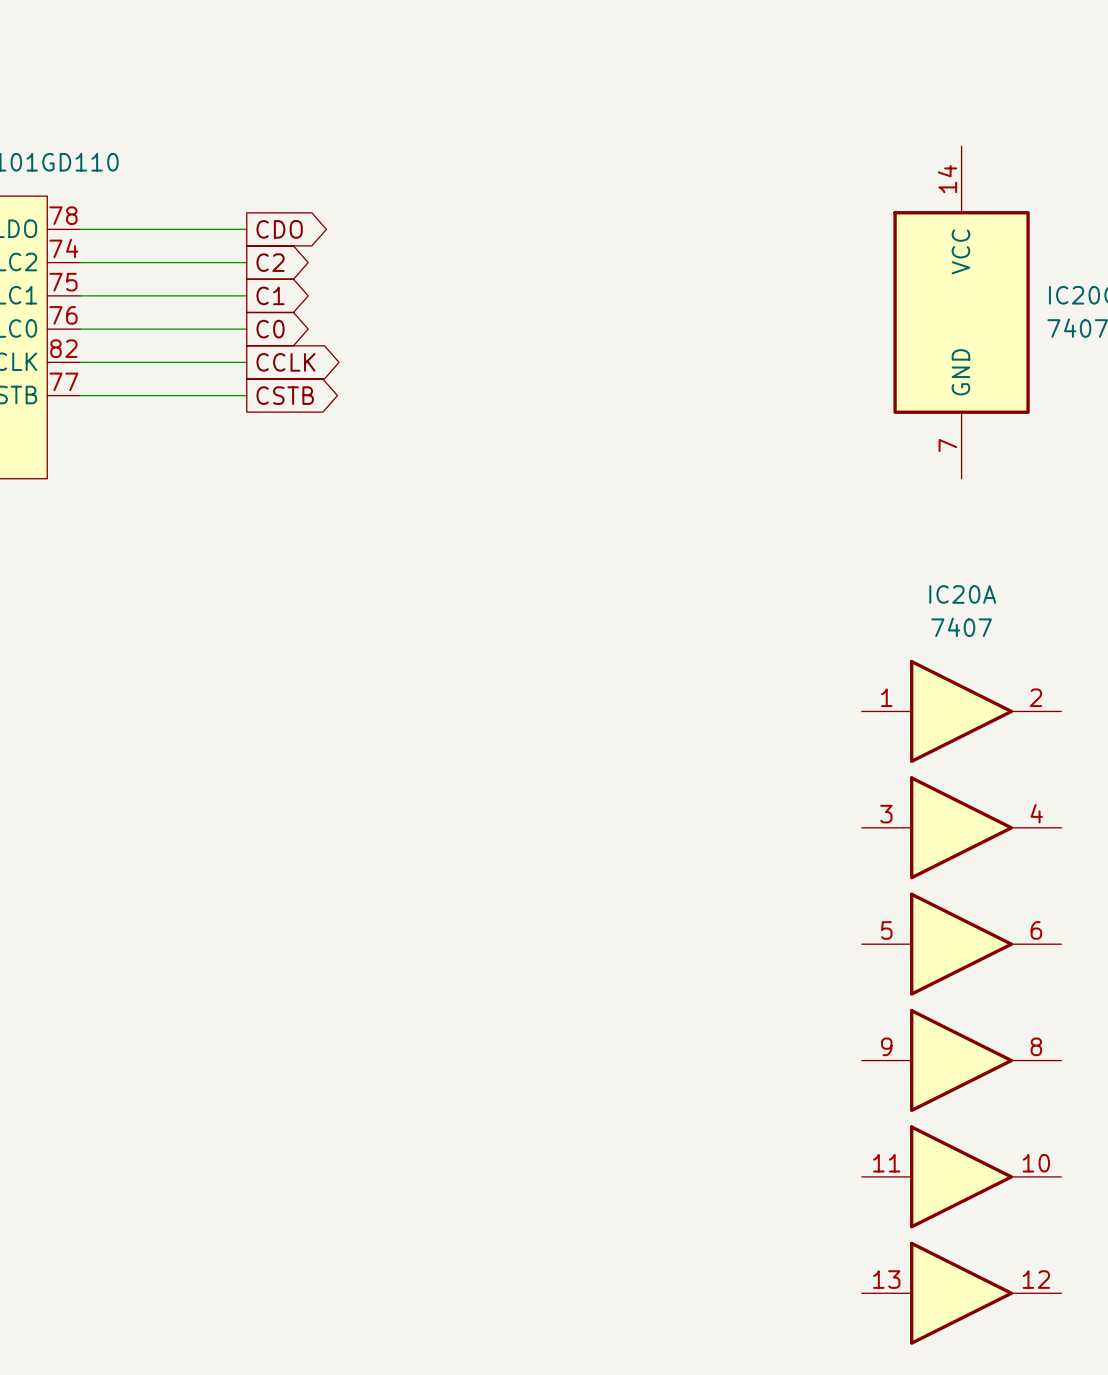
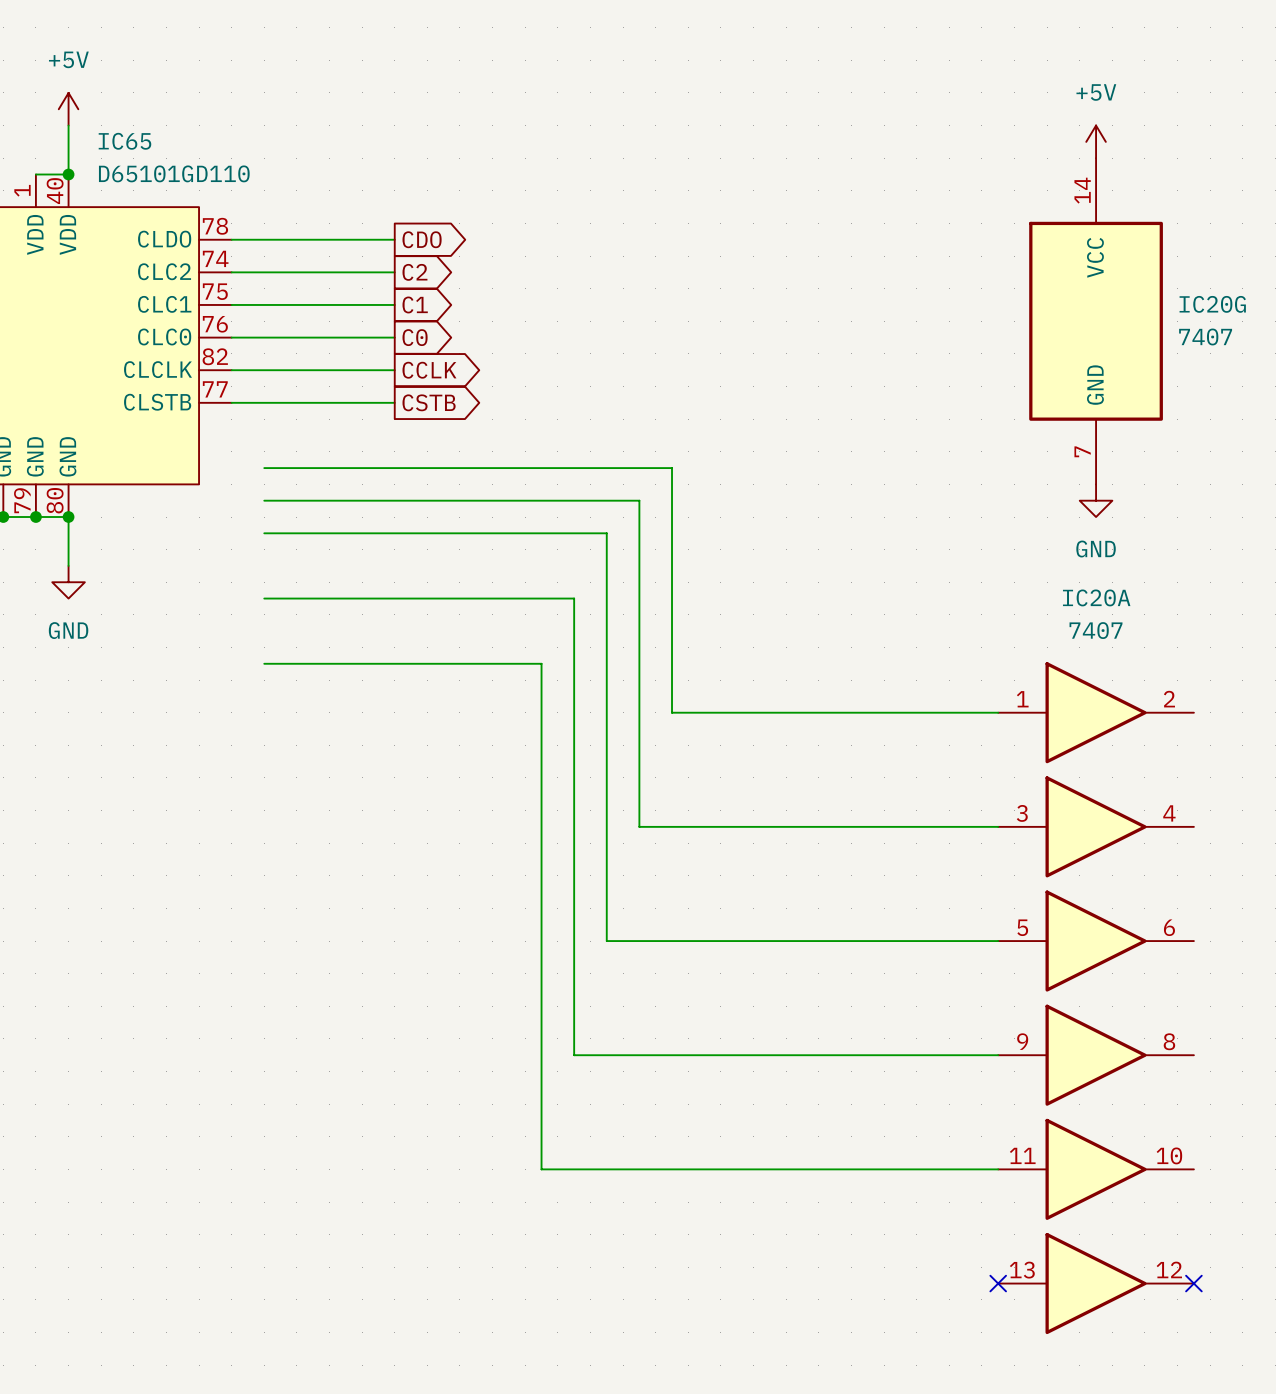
power symbol: none -> +5V (1096, 141)
wire: none -> (264, 468) (672, 468) (672, 712) (998, 712)
wire: none -> (264, 500) (639, 500) (639, 826) (998, 826)
power symbol: none -> GND (1096, 500)
wire: none -> (264, 533) (606, 533) (606, 941) (998, 941)
wire: none -> (264, 598) (574, 598) (574, 1055) (998, 1055)
wire: none -> (264, 663) (541, 663) (541, 1169) (998, 1169)
no-connect mark: none -> (998, 1283)
no-connect mark: none -> (1193, 1283)

